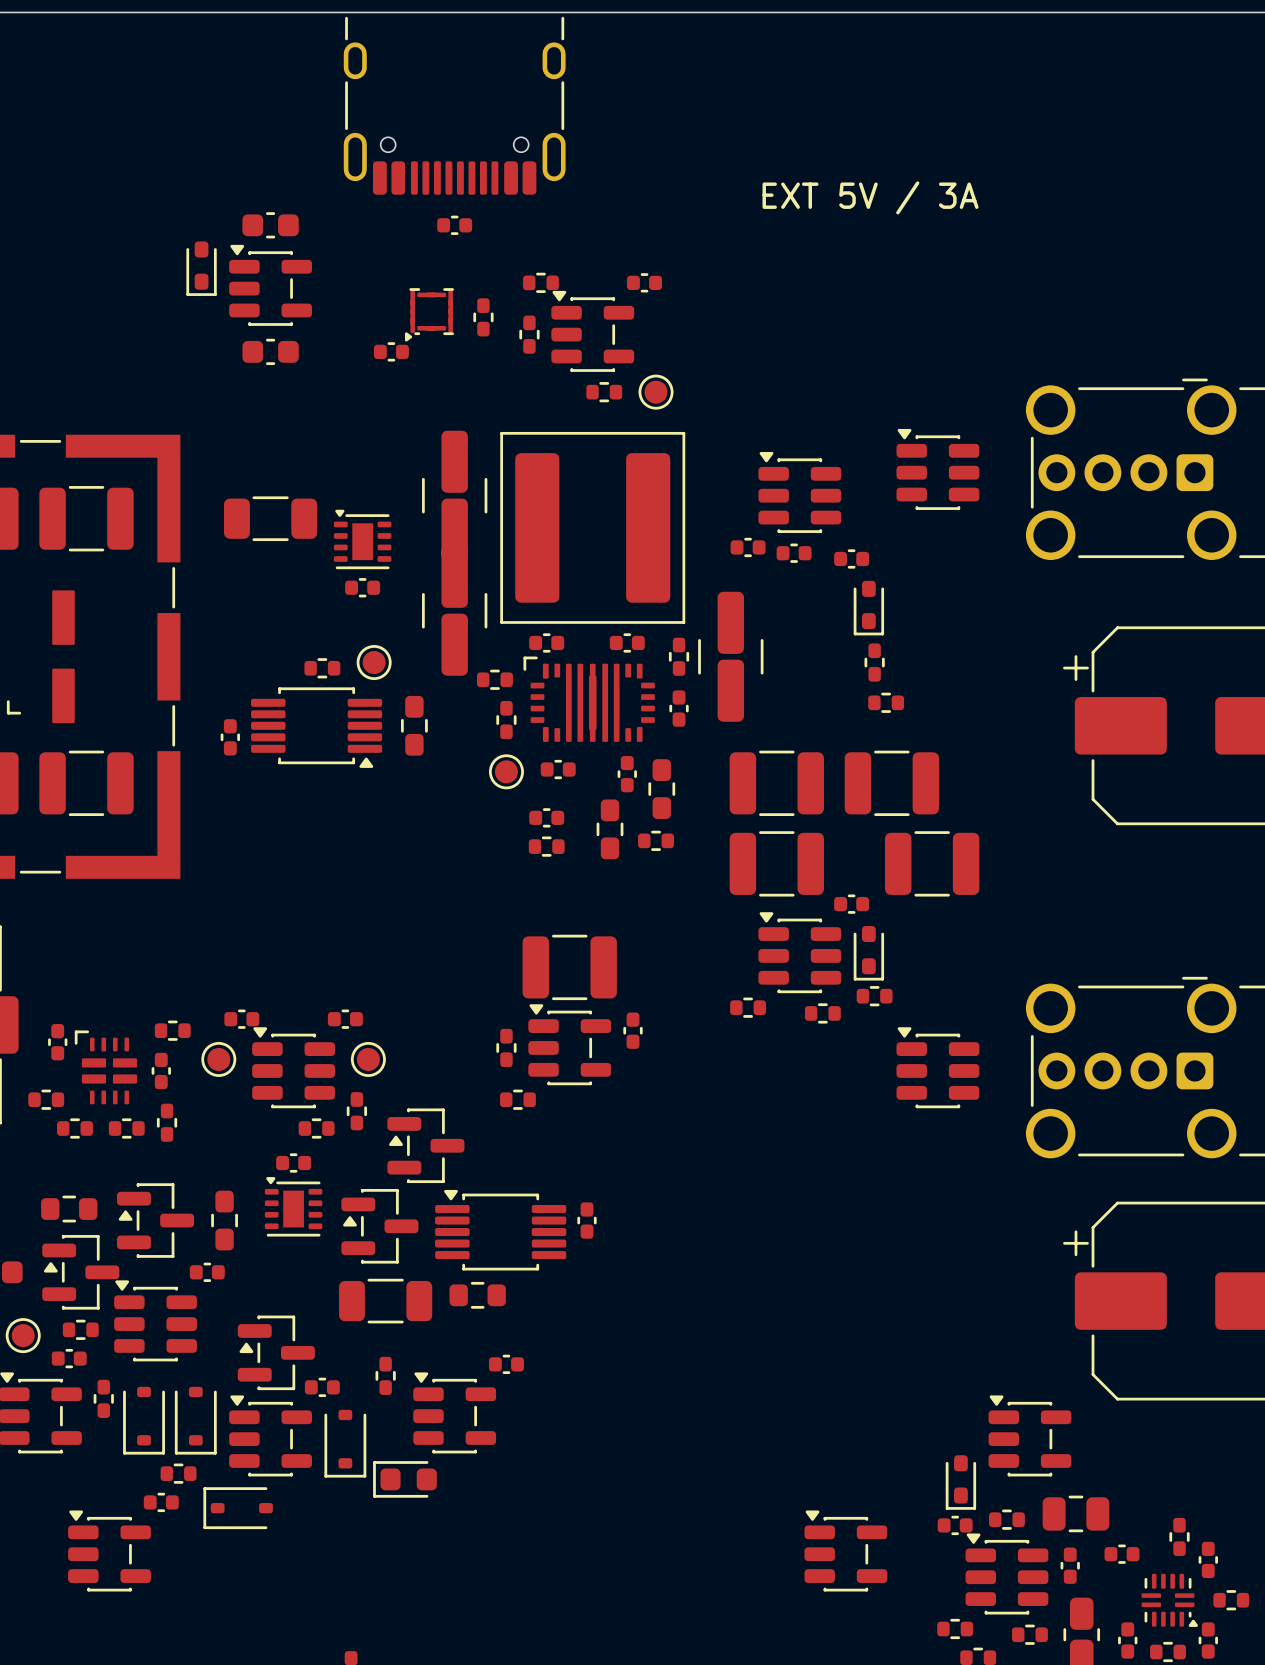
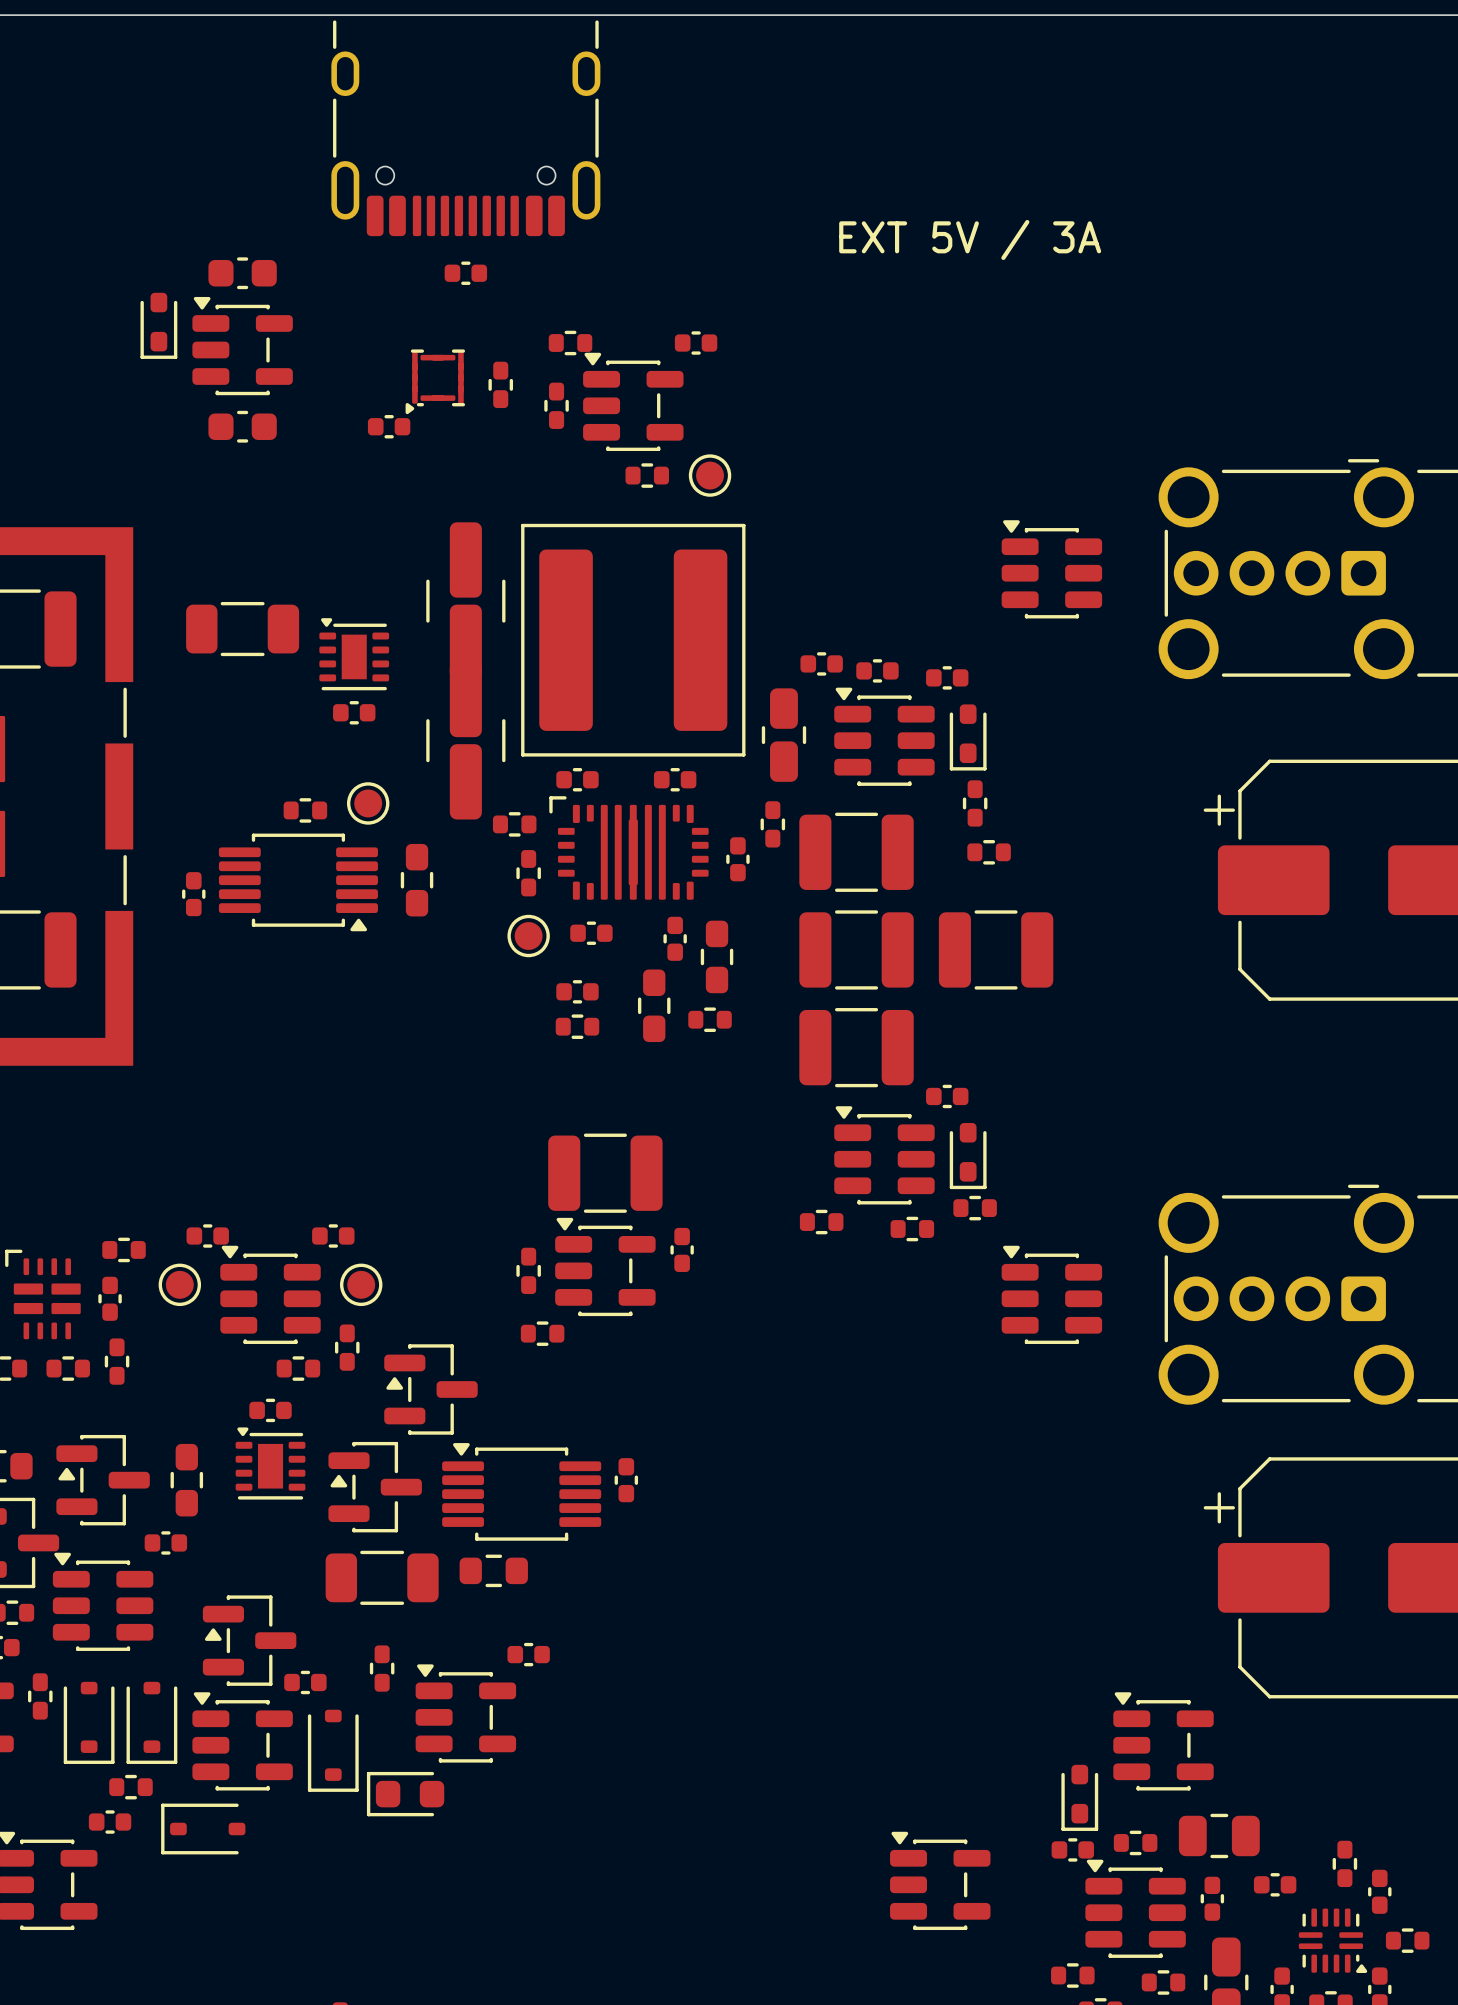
part position: (799, 492) -> (884, 736)
part: none -> (783, 735)
part position: (679, 656) -> (772, 824)
part: (730, 656) -> none
part position: (932, 863) -> (856, 852)

